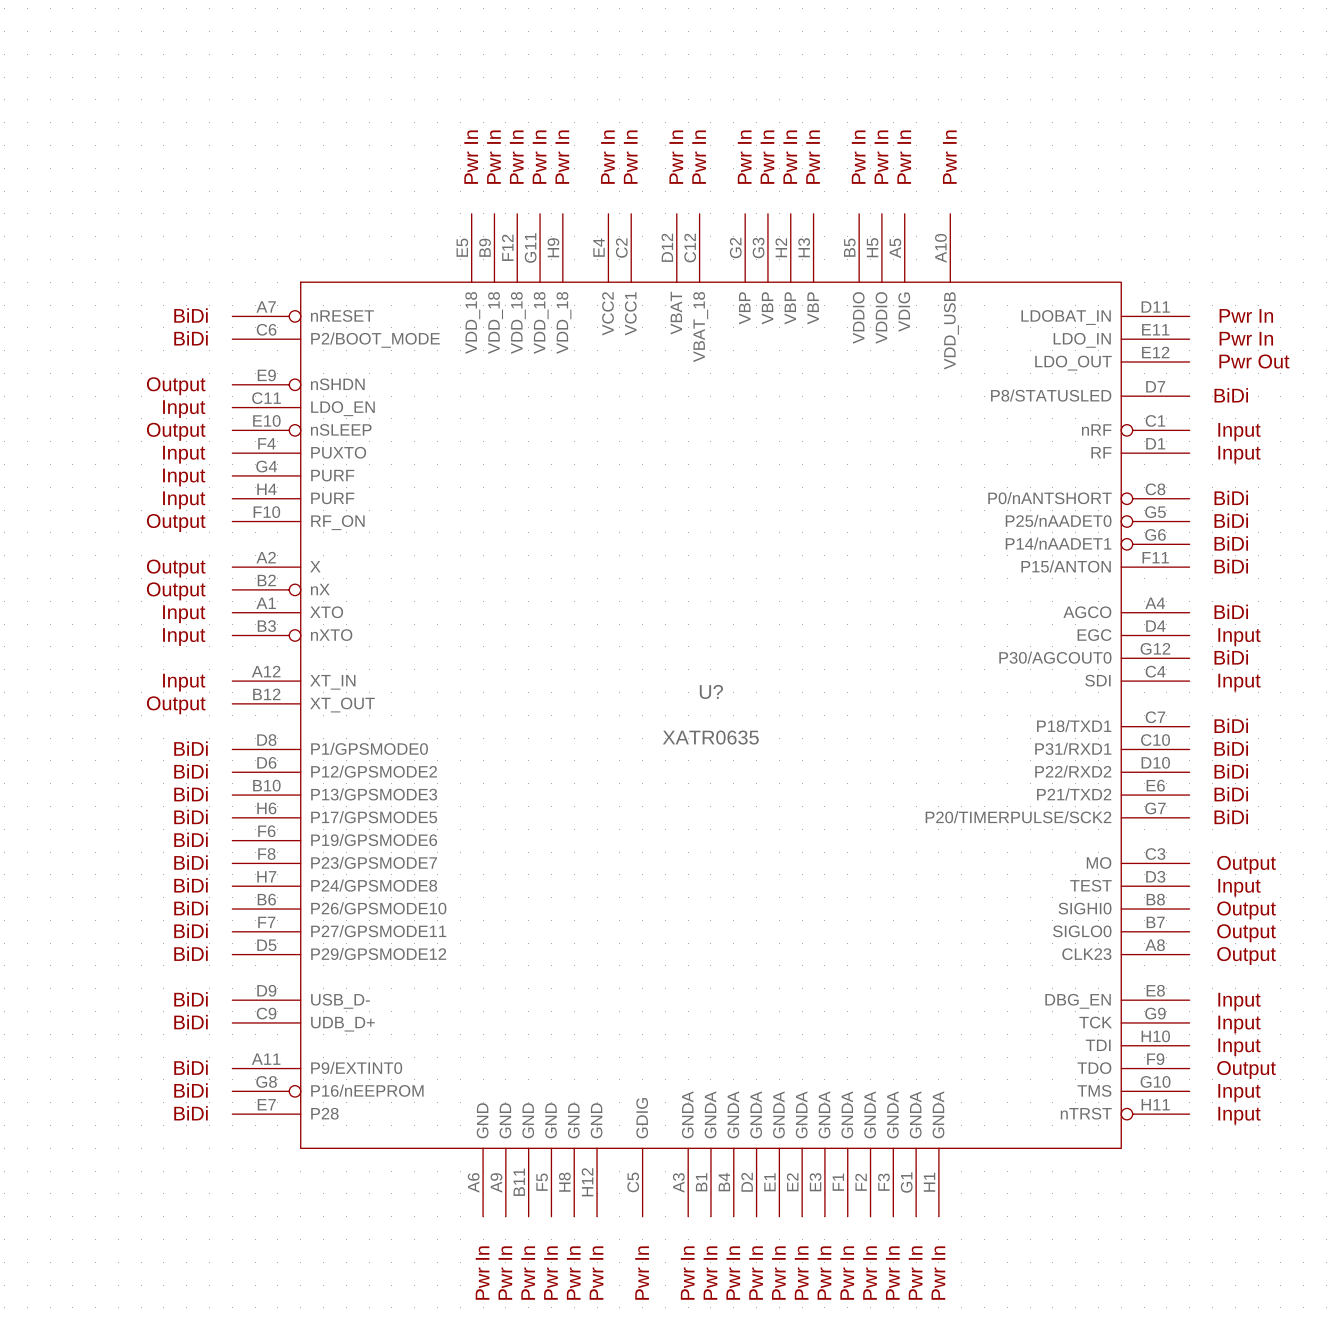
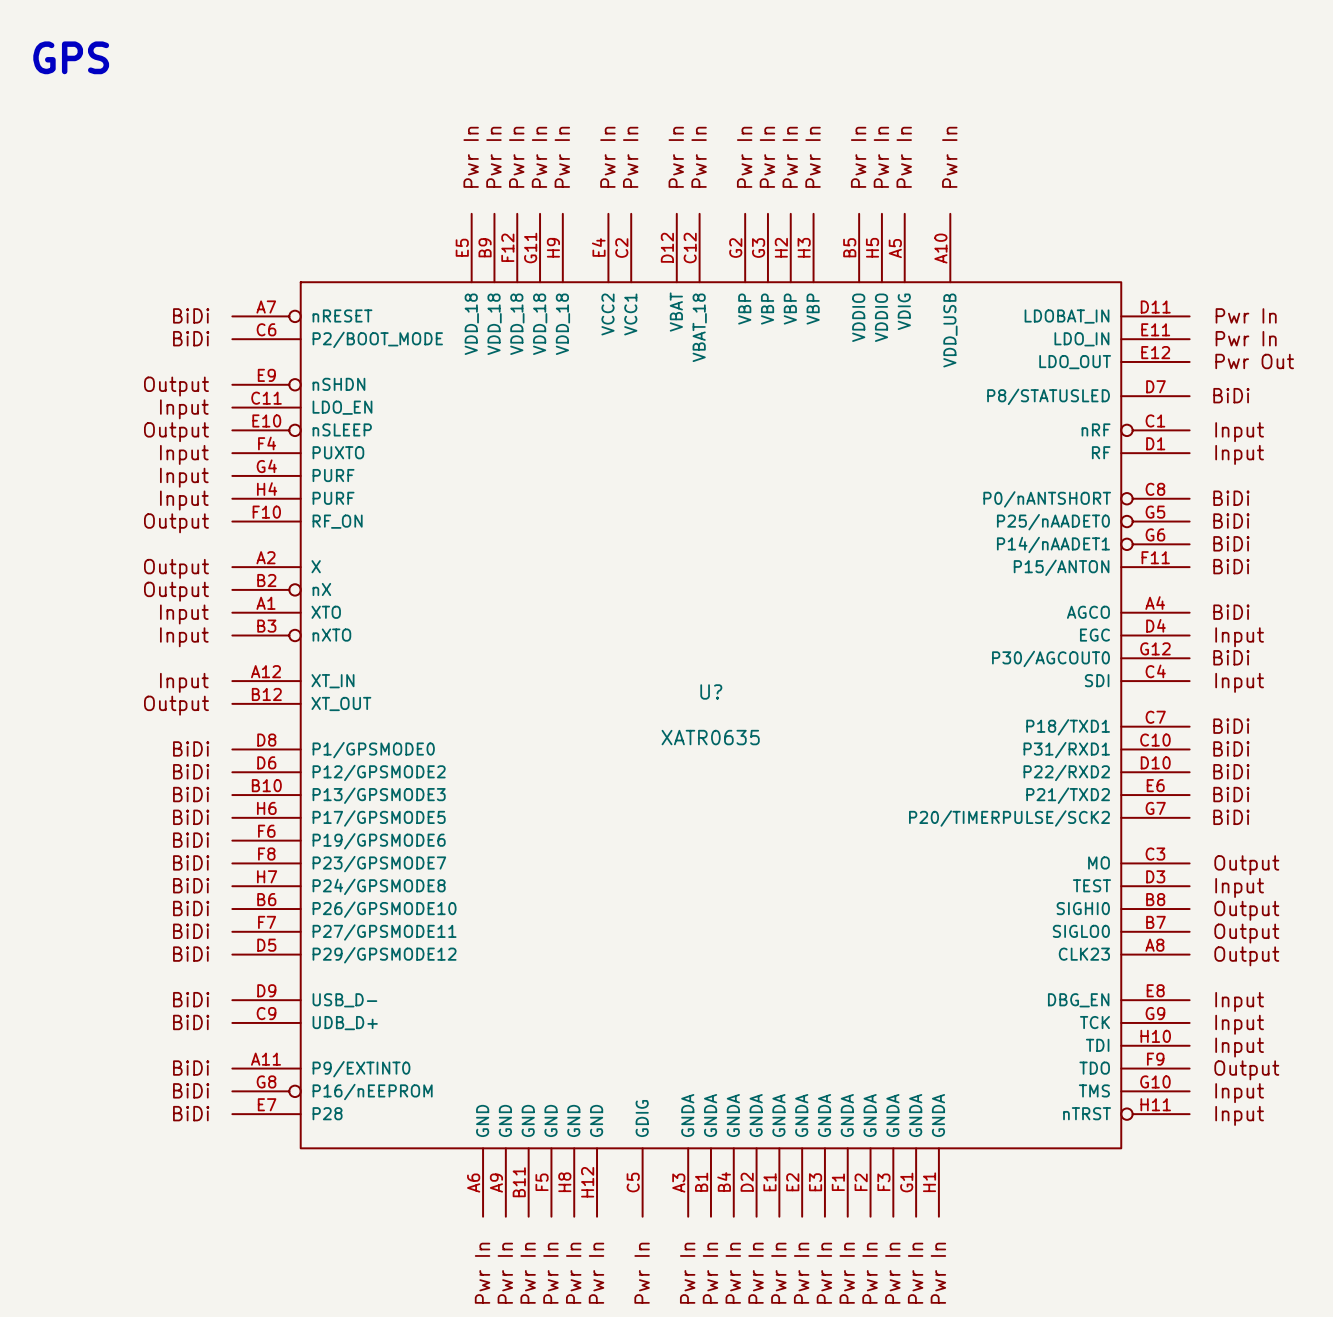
text: none -> GPS (71, 57)

